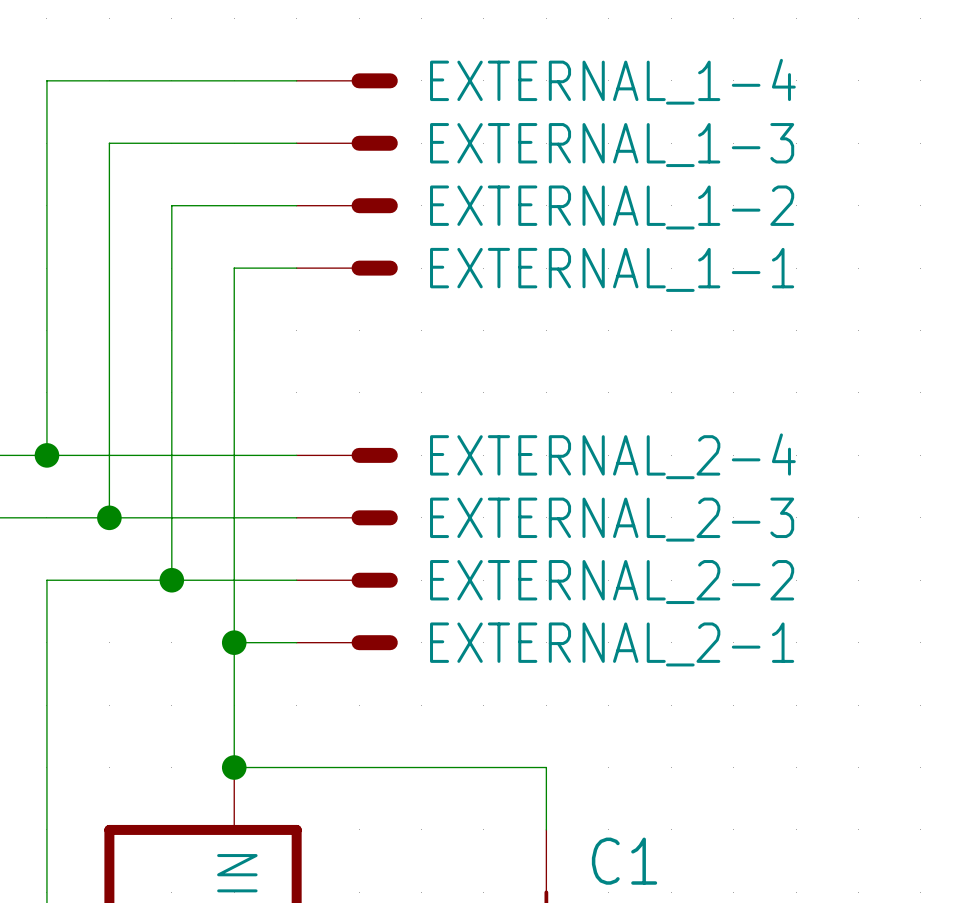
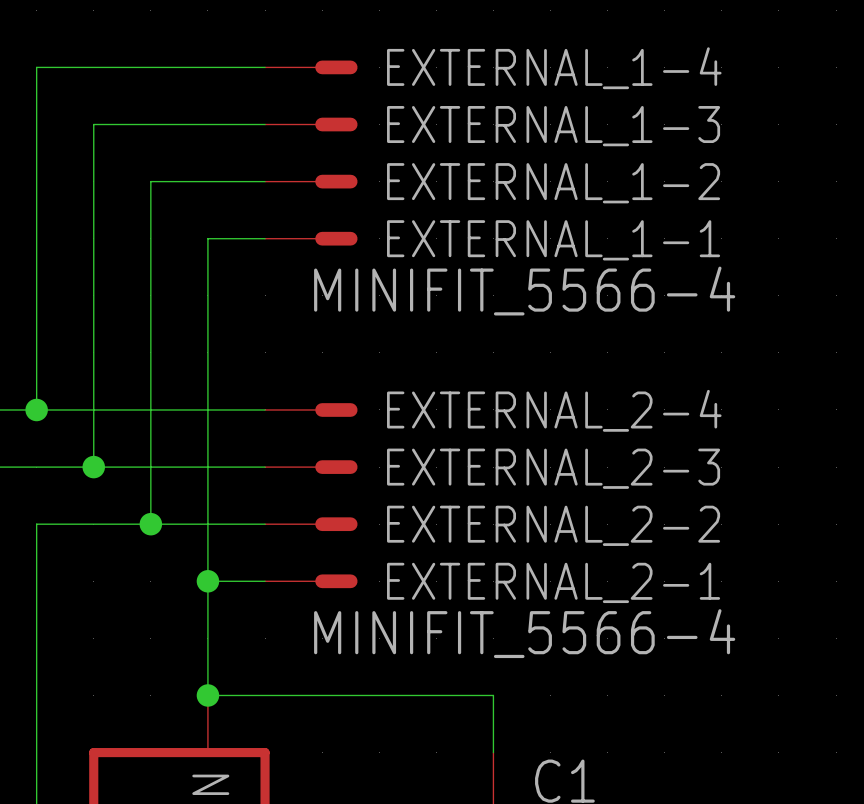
EXTERNAL_1-1 value: none -> MINIFIT_5566-4 (524, 291)
EXTERNAL_2-1 value: none -> MINIFIT_5566-4 (524, 633)

